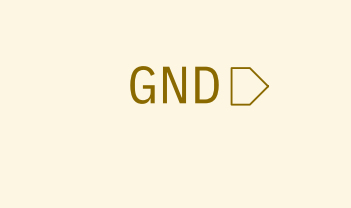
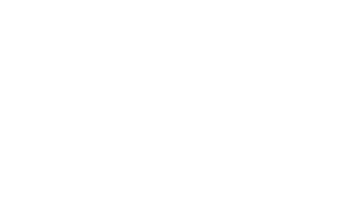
hierarchical label: GND (174, 84) -> none

